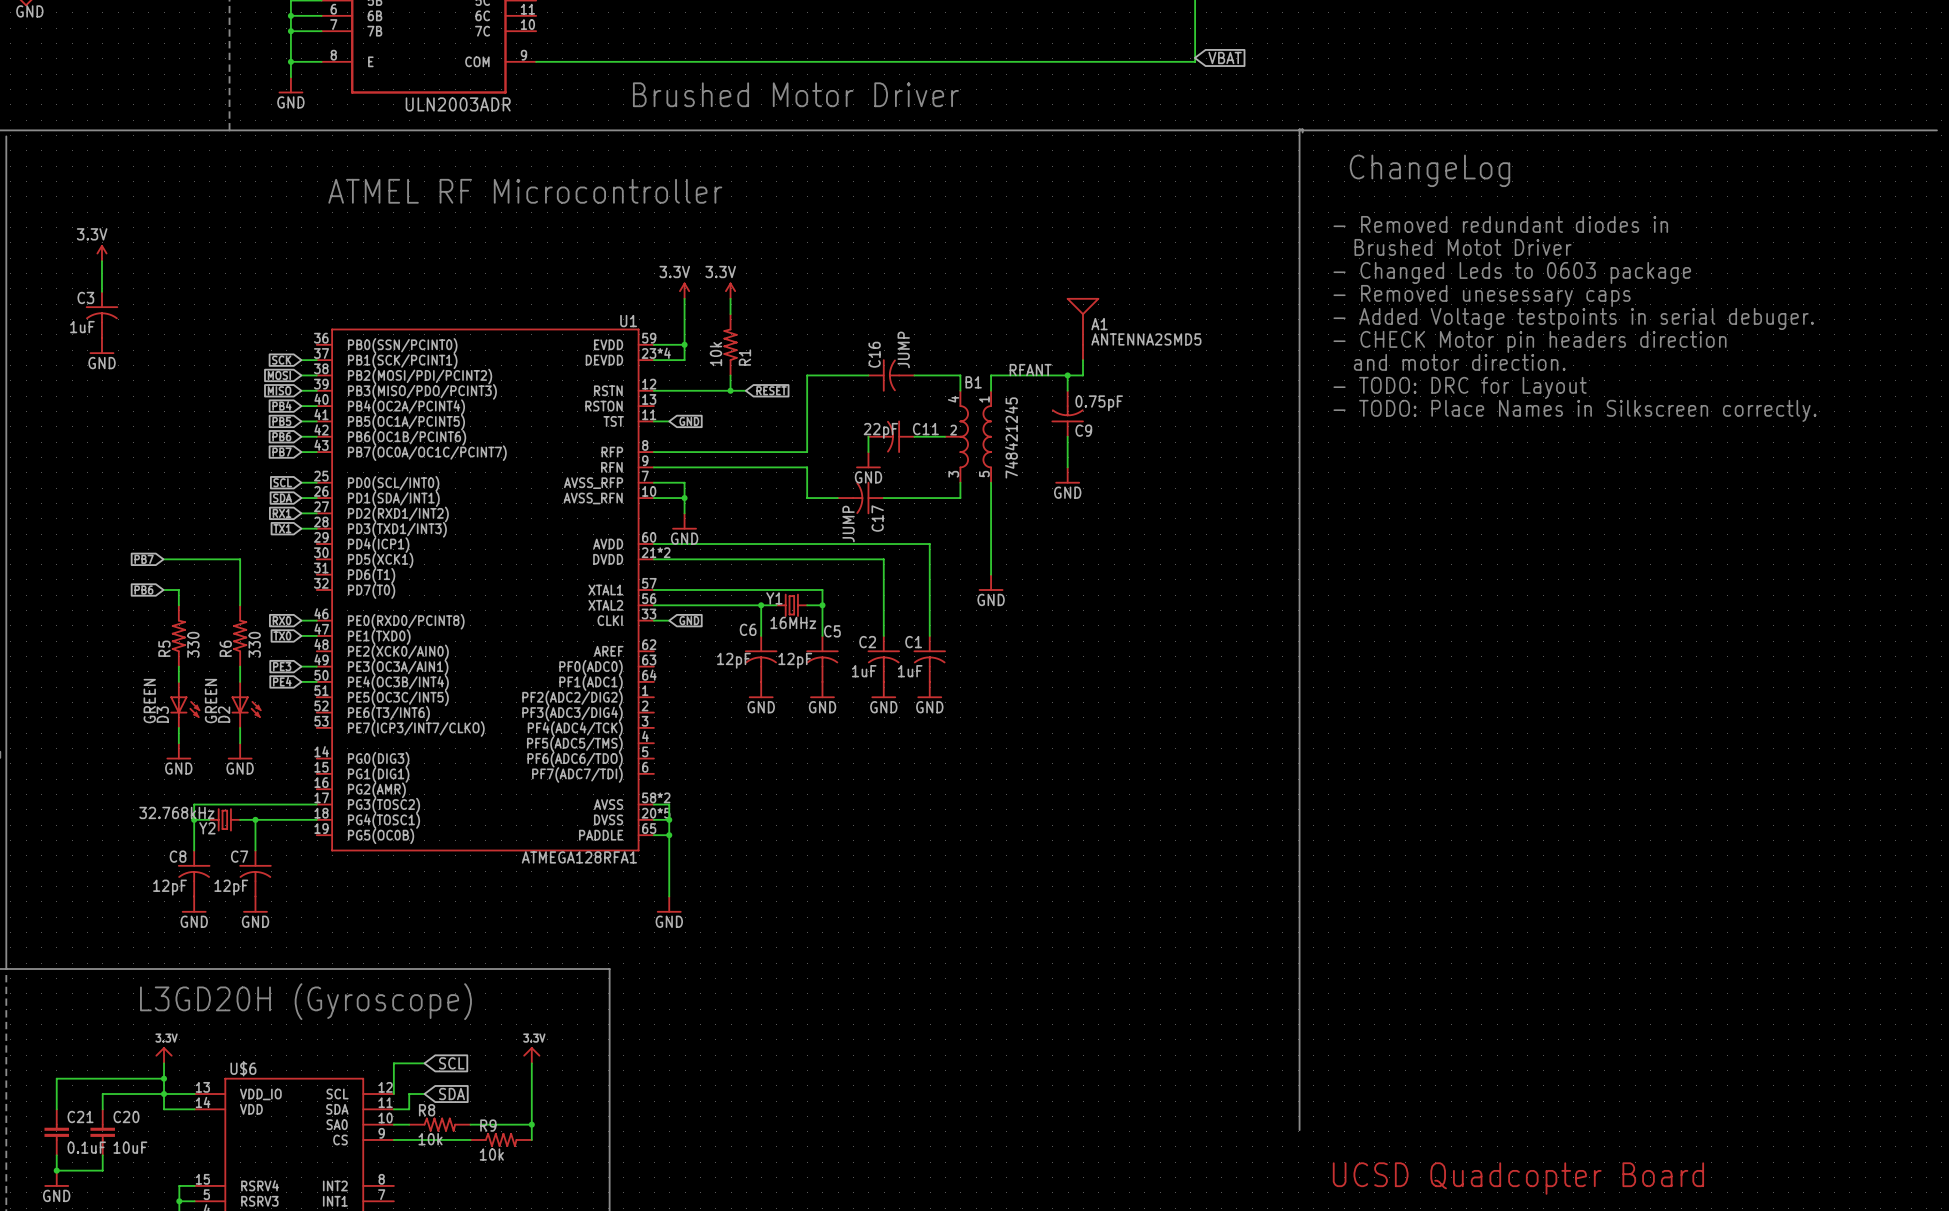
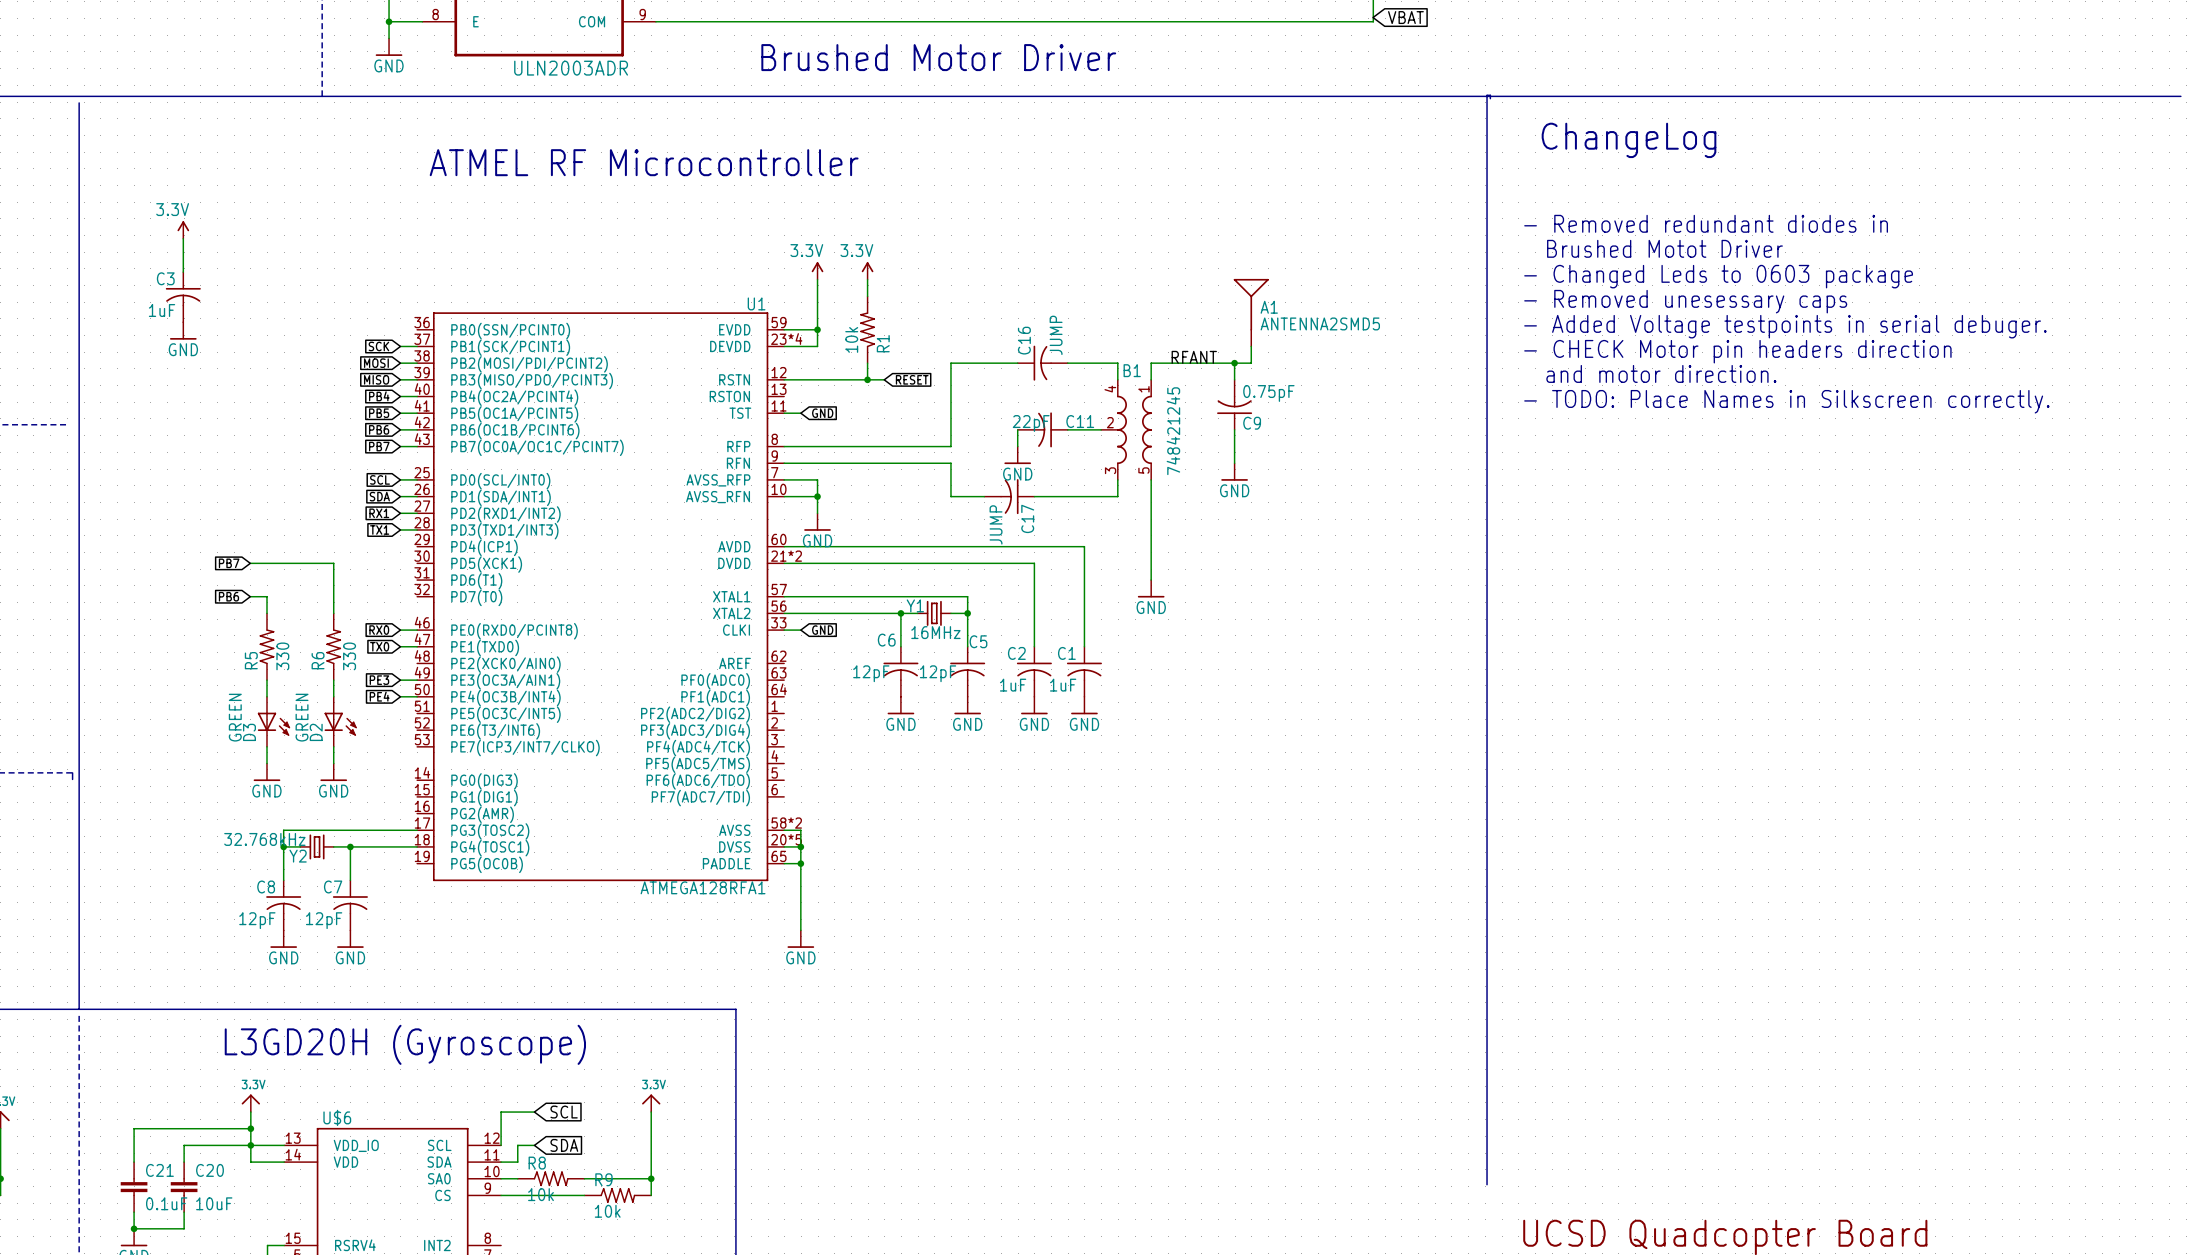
text: - Removed redundant diodes in (1500, 224) -> none
text: Brushed Motot Driver (1463, 247) -> - Removed redundant diodes in (1706, 223)
text: - Changed Leds to 0603 package (1512, 272) -> Brushed Motot Driver (1664, 248)
text: - Removed unesessary caps (1482, 295) -> - Changed Leds to 0603 package (1718, 276)
text: - Added Voltage testpoints in serial debuger. (1573, 318) -> - Removed unesessary caps (1685, 301)
text: - CHECK Motor pin headers direction (1530, 341) -> - Added Voltage testpoints in serial debuger. (1785, 326)
text: and motor direction. (1459, 362) -> - CHECK Motor pin headers direction (1737, 351)
text: - TODO: DRC for Layout (1460, 387) -> and motor direction. (1661, 373)

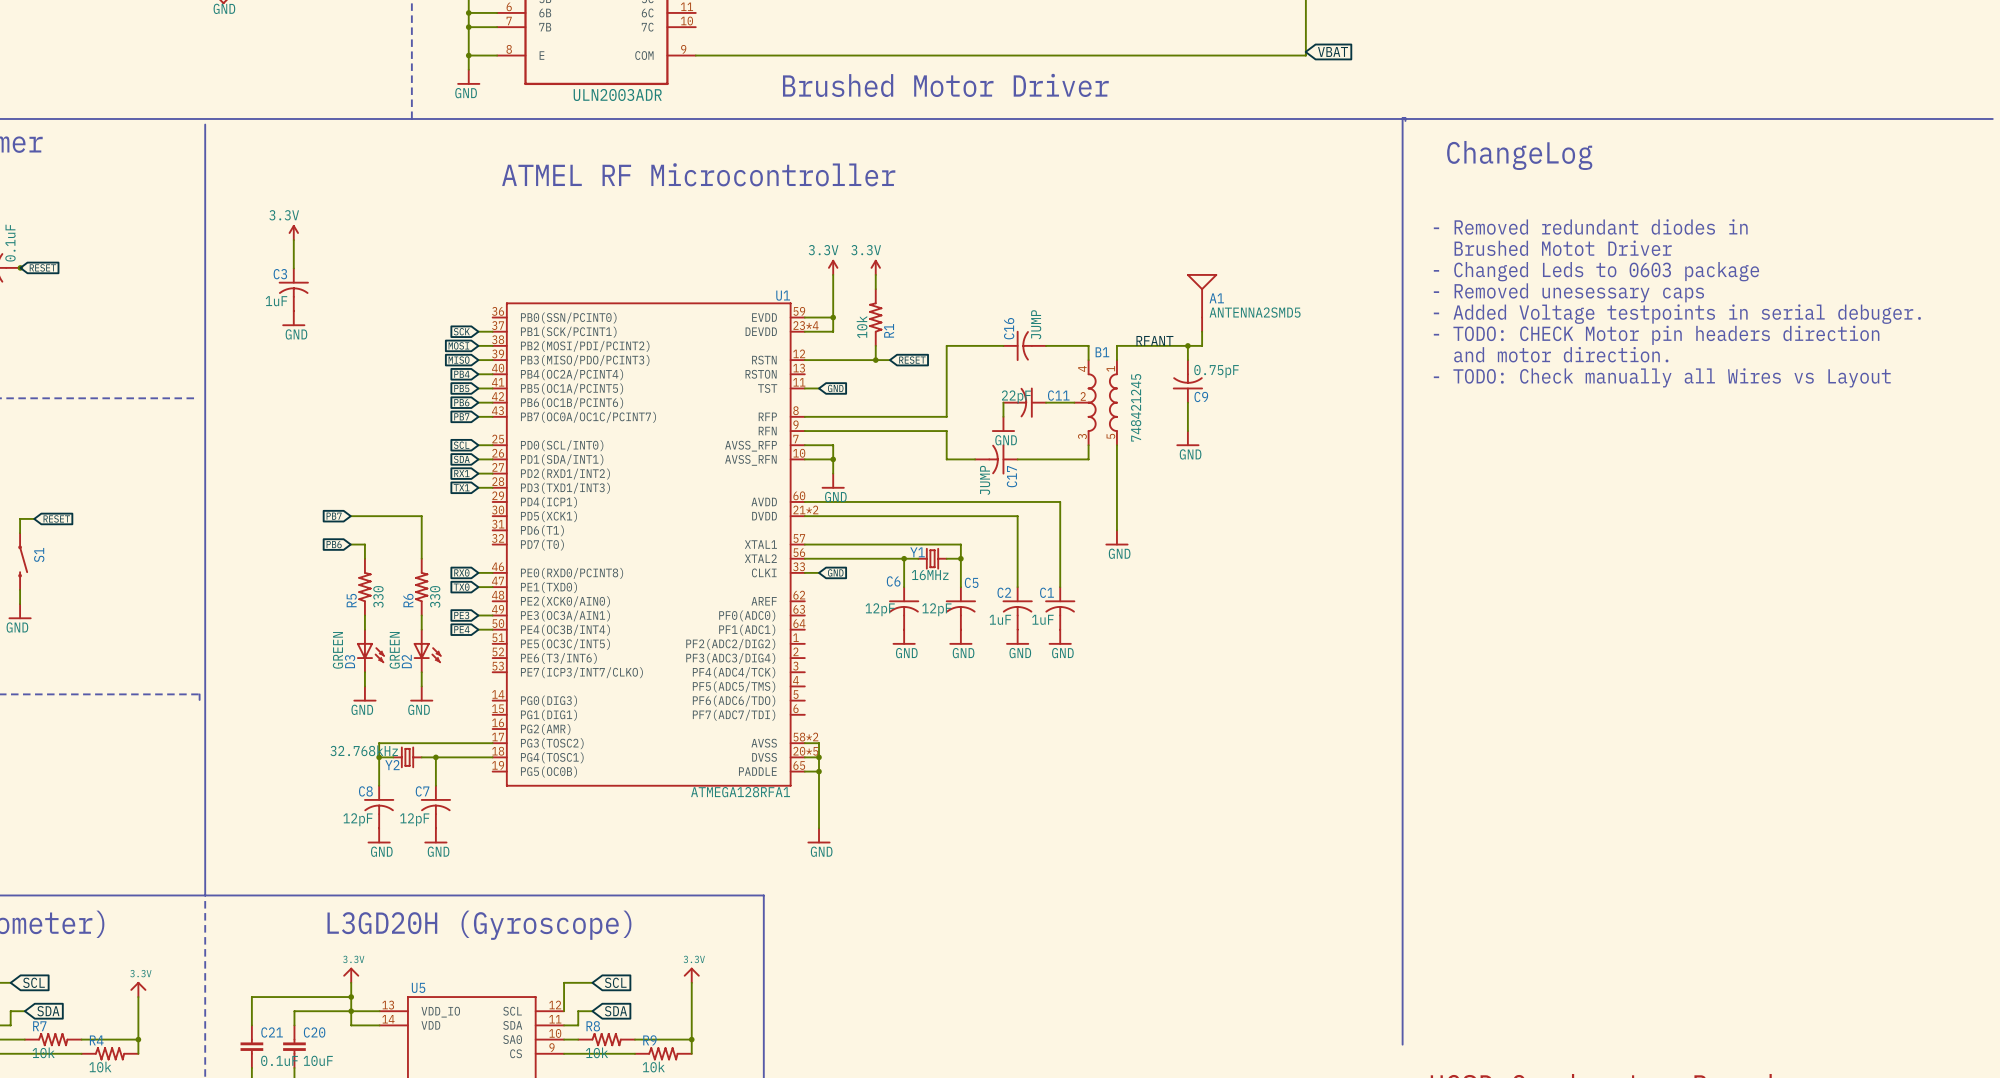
text: - CHECK Motor pin headers direction (1737, 351) -> - TODO: CHECK Motor pin headers direction (1656, 335)
text: - TODO: Place Names in Silkscreen correctly. (1786, 401) -> - TODO: Check manually all Wires vs Layout (1662, 377)
U$6 name: U$6 (337, 1117) -> U5 (418, 987)

